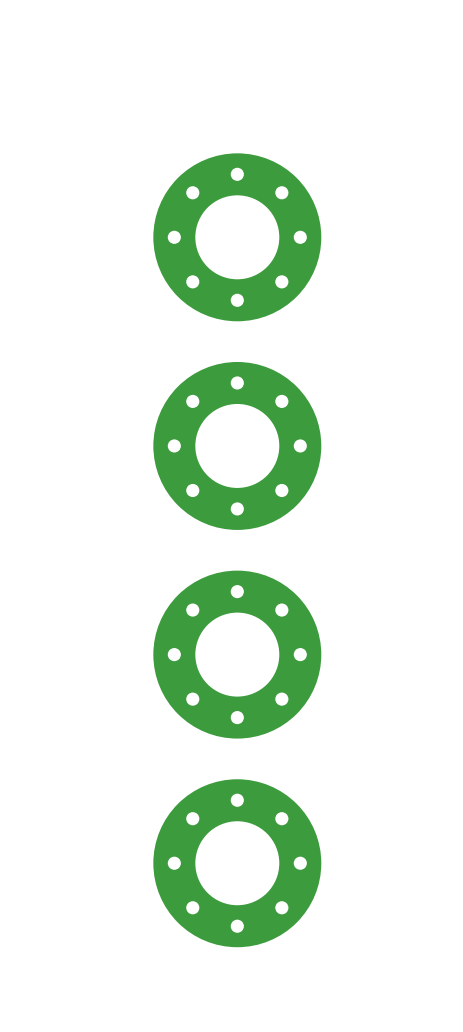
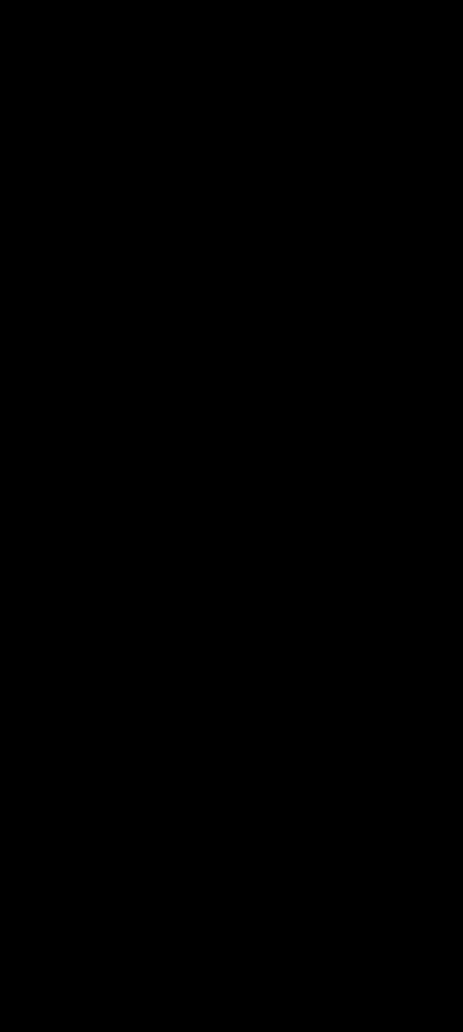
part: (237, 237) -> none
part: (237, 445) -> none
part: (237, 654) -> none
part: (237, 863) -> none

